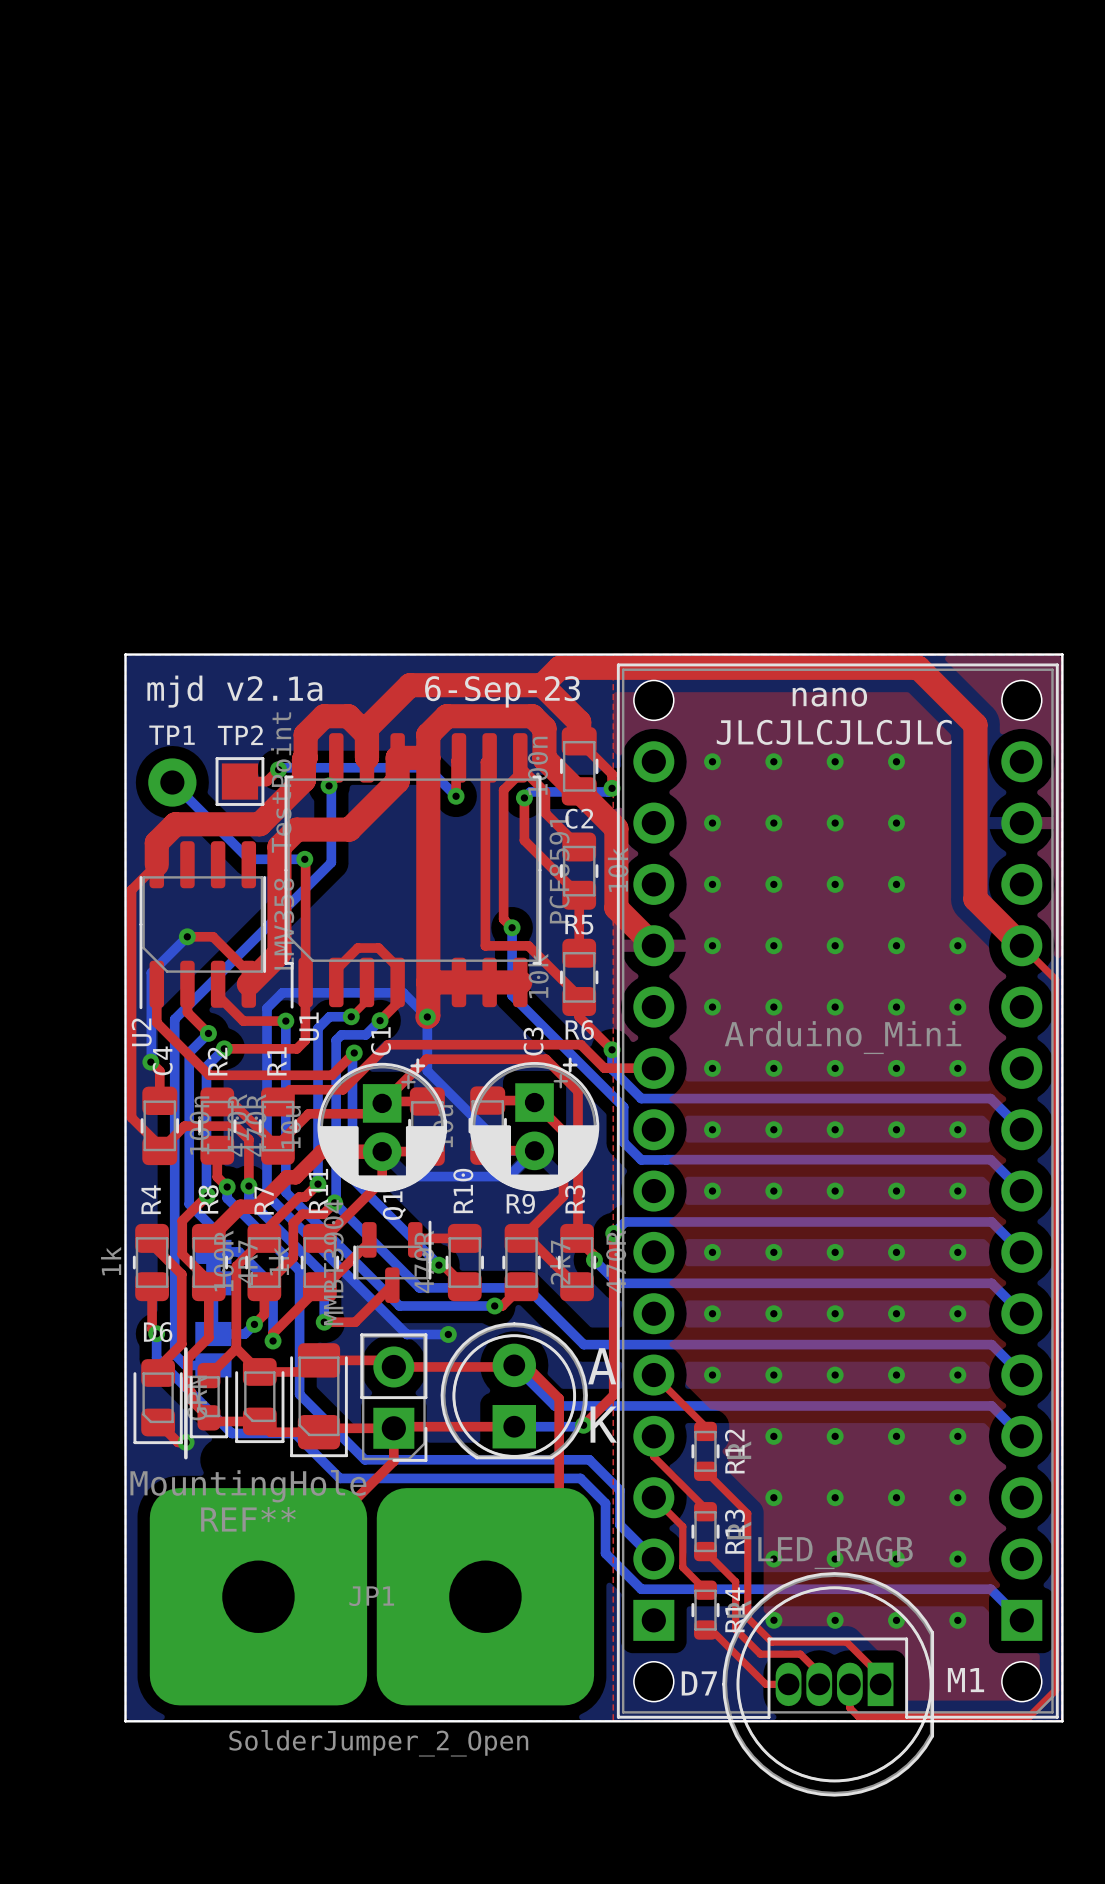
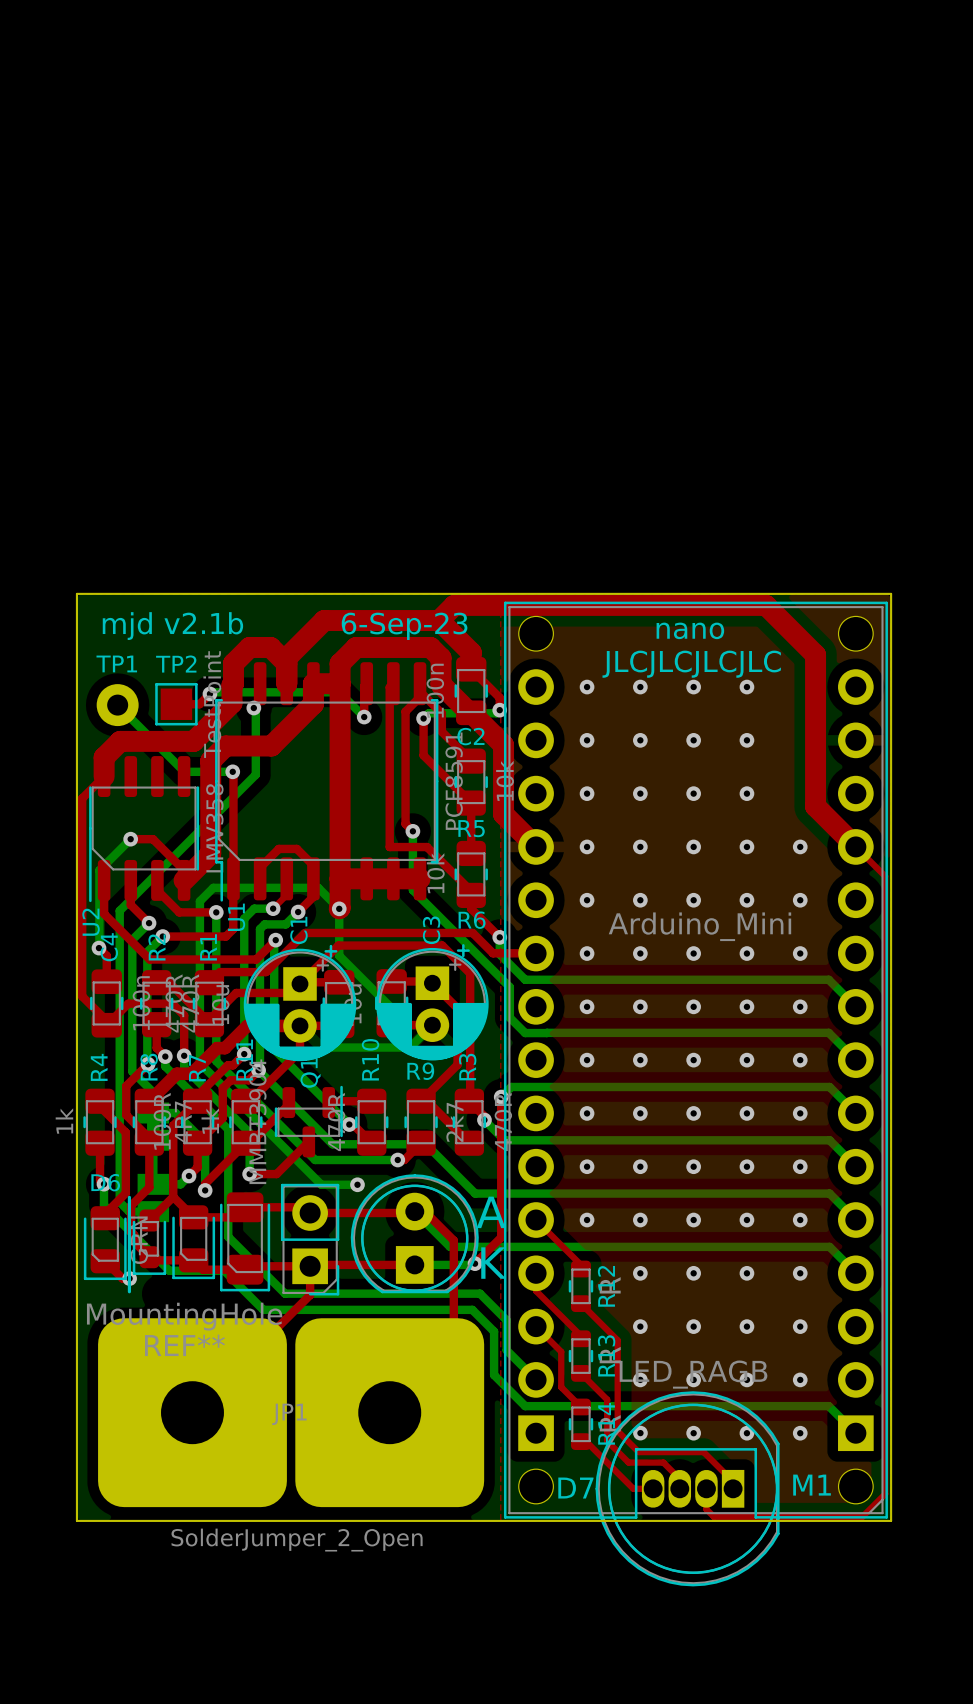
text: mjd v2.1a (234, 691) -> mjd v2.1b (172, 626)

